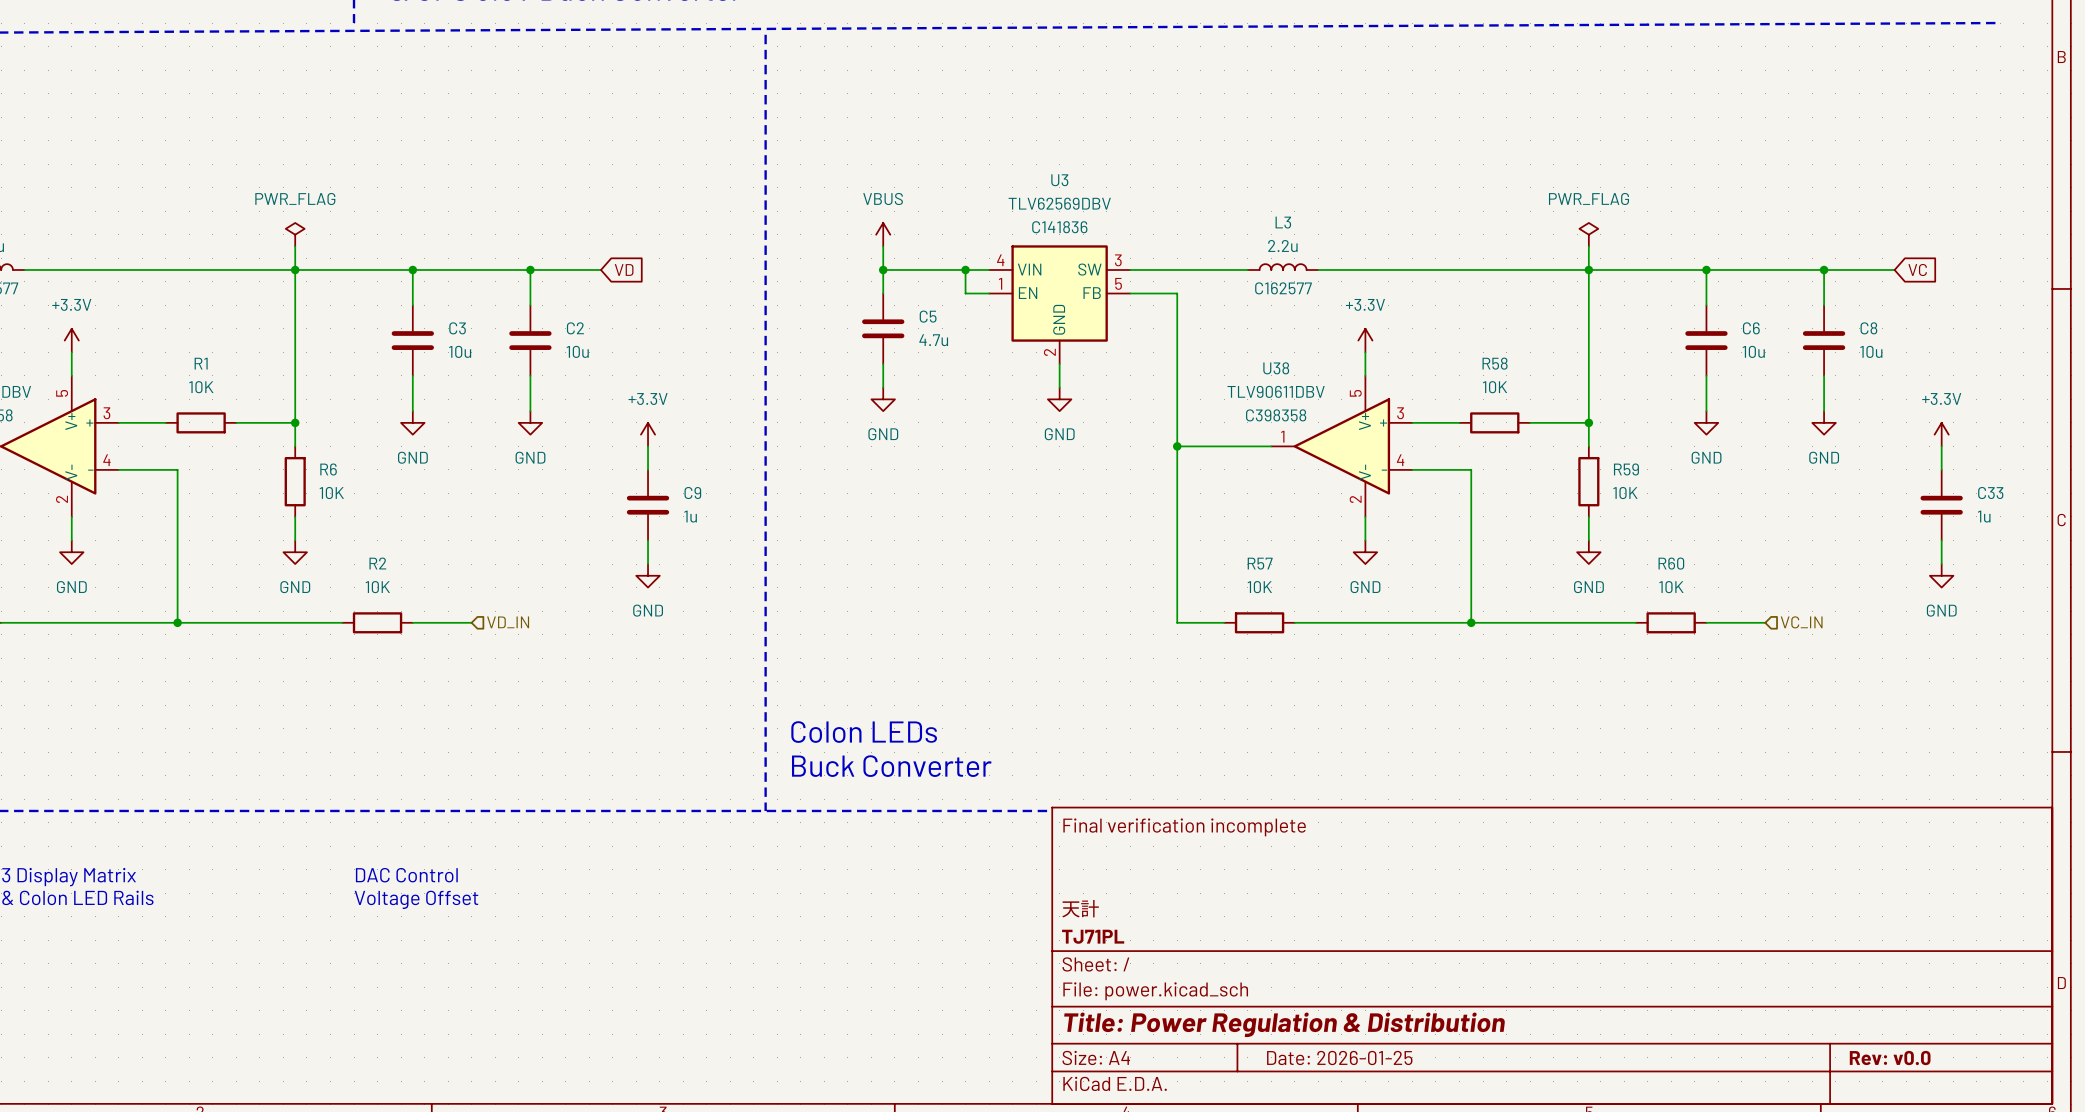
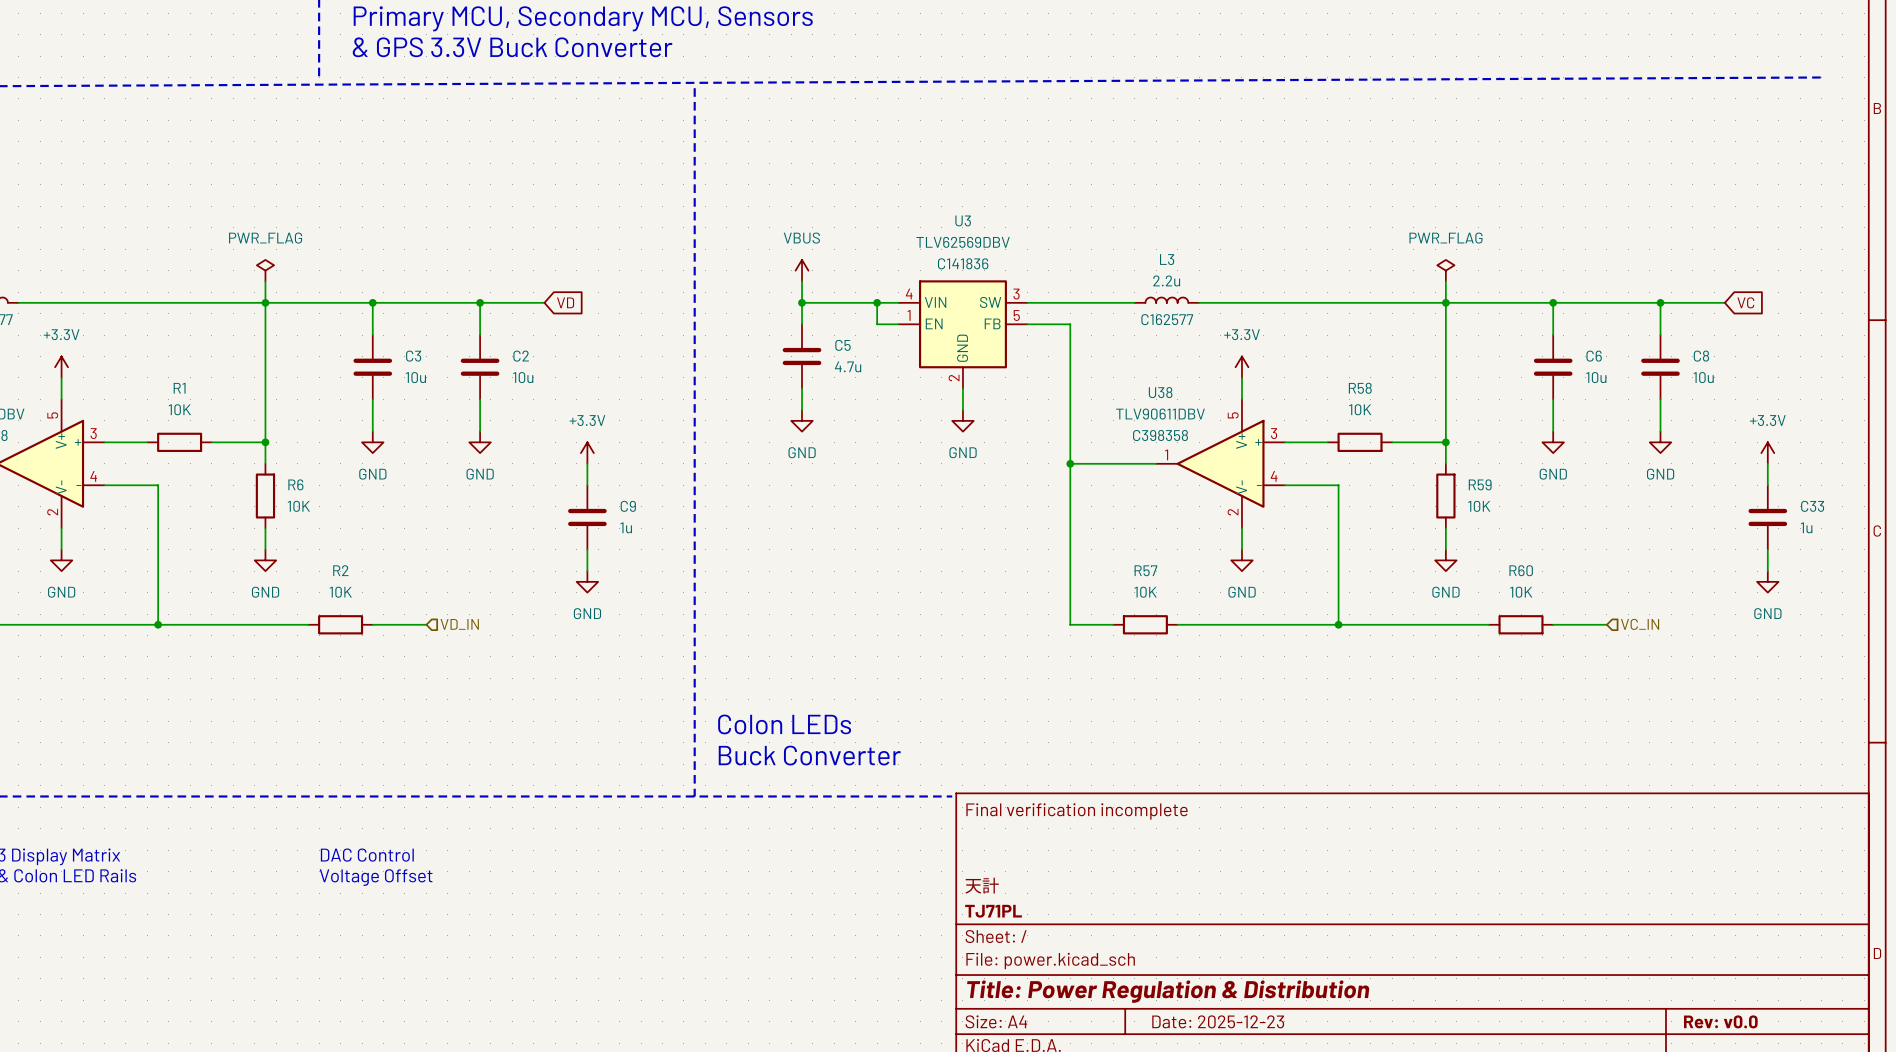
title block: Date: 2026-01-25 (1339, 1057) -> Date: 2025-12-23 (1218, 1021)

